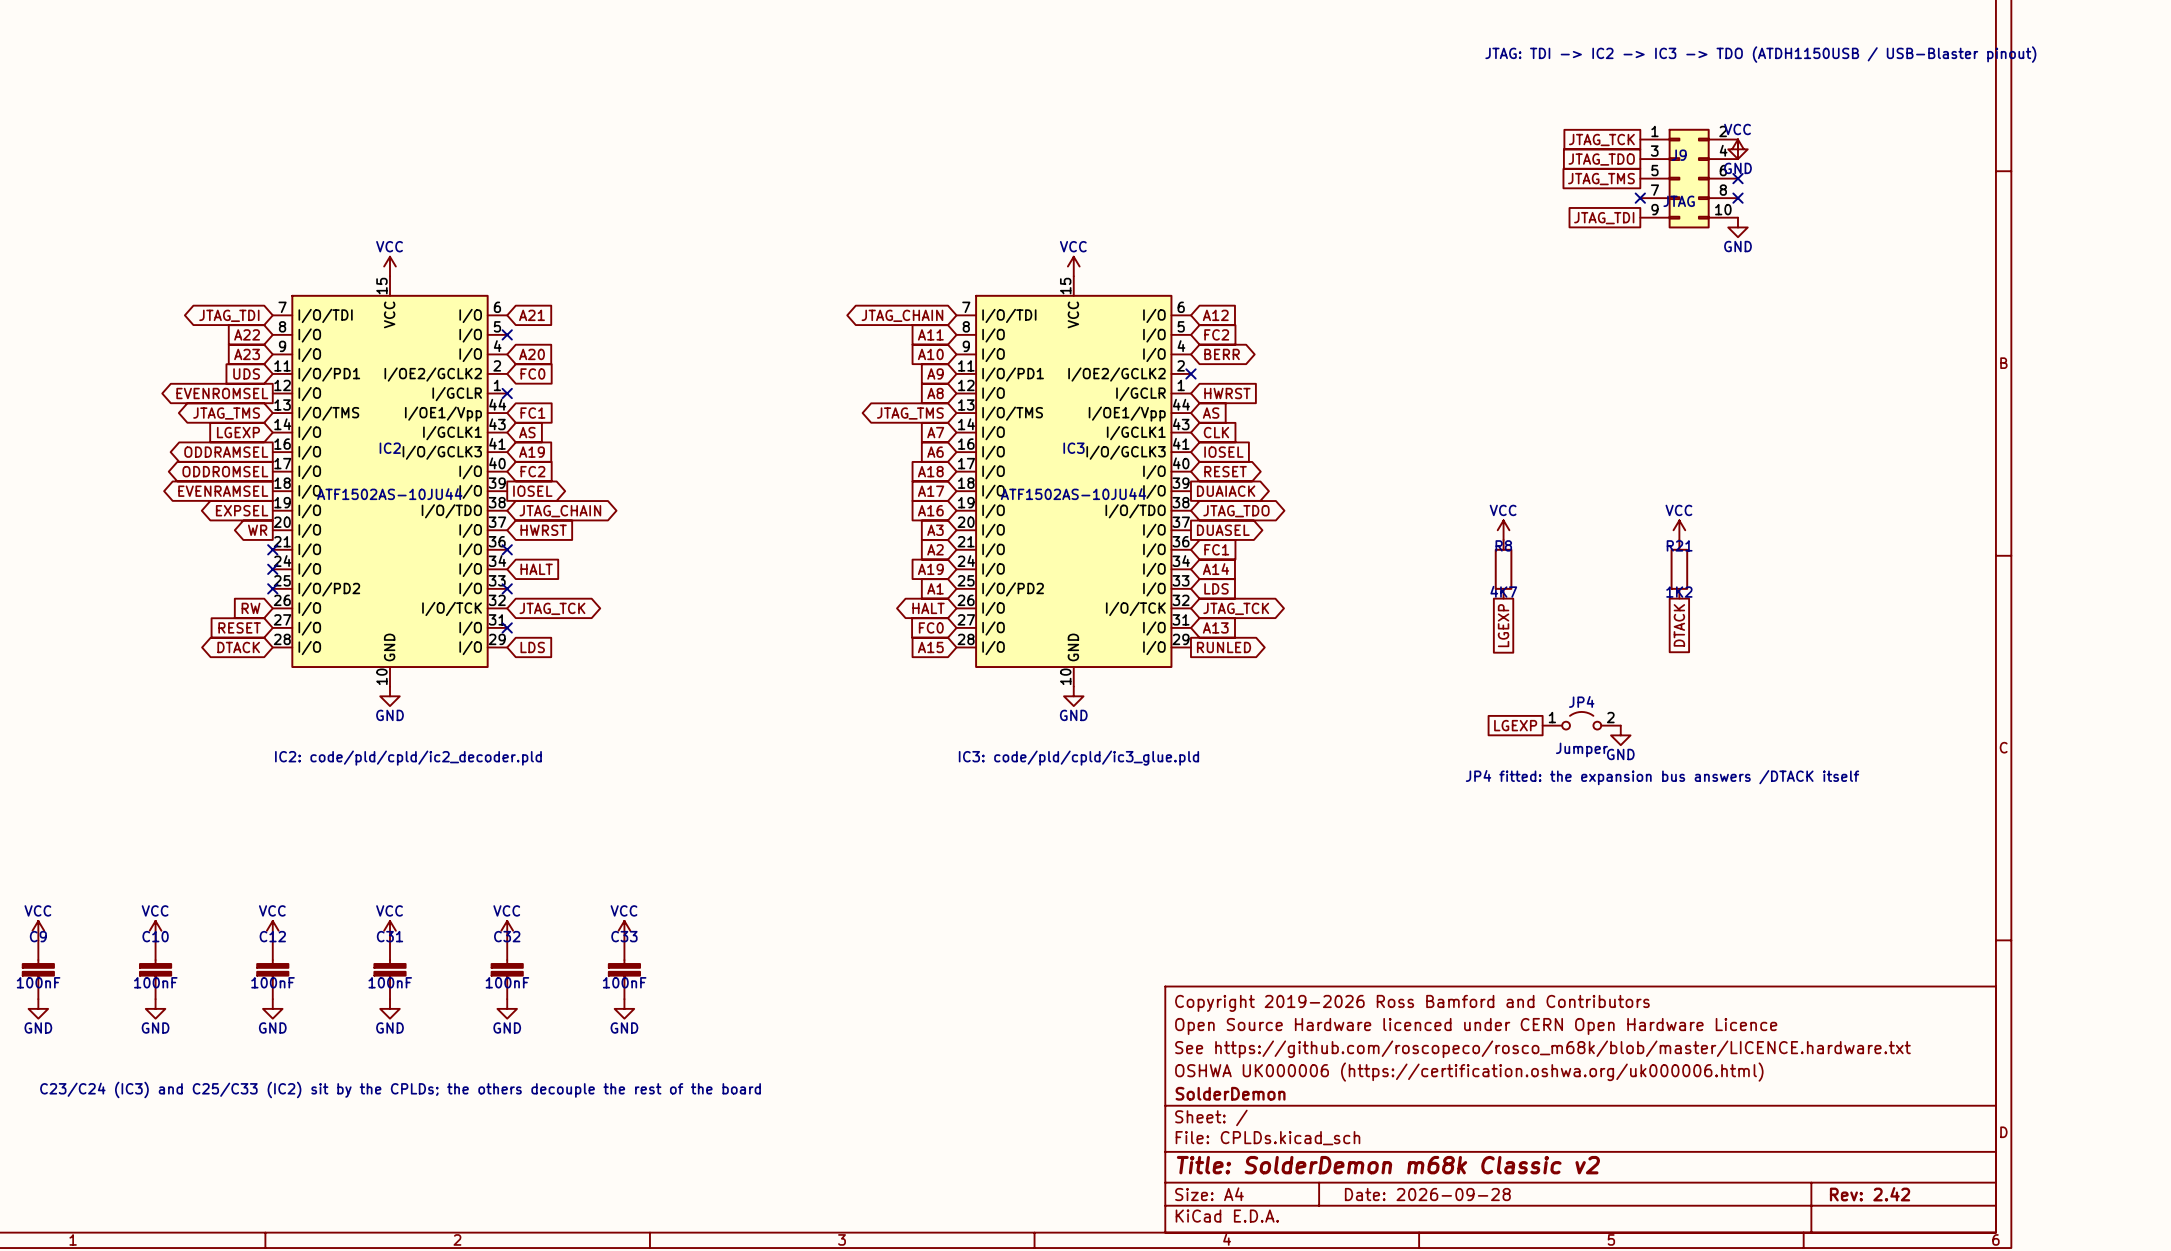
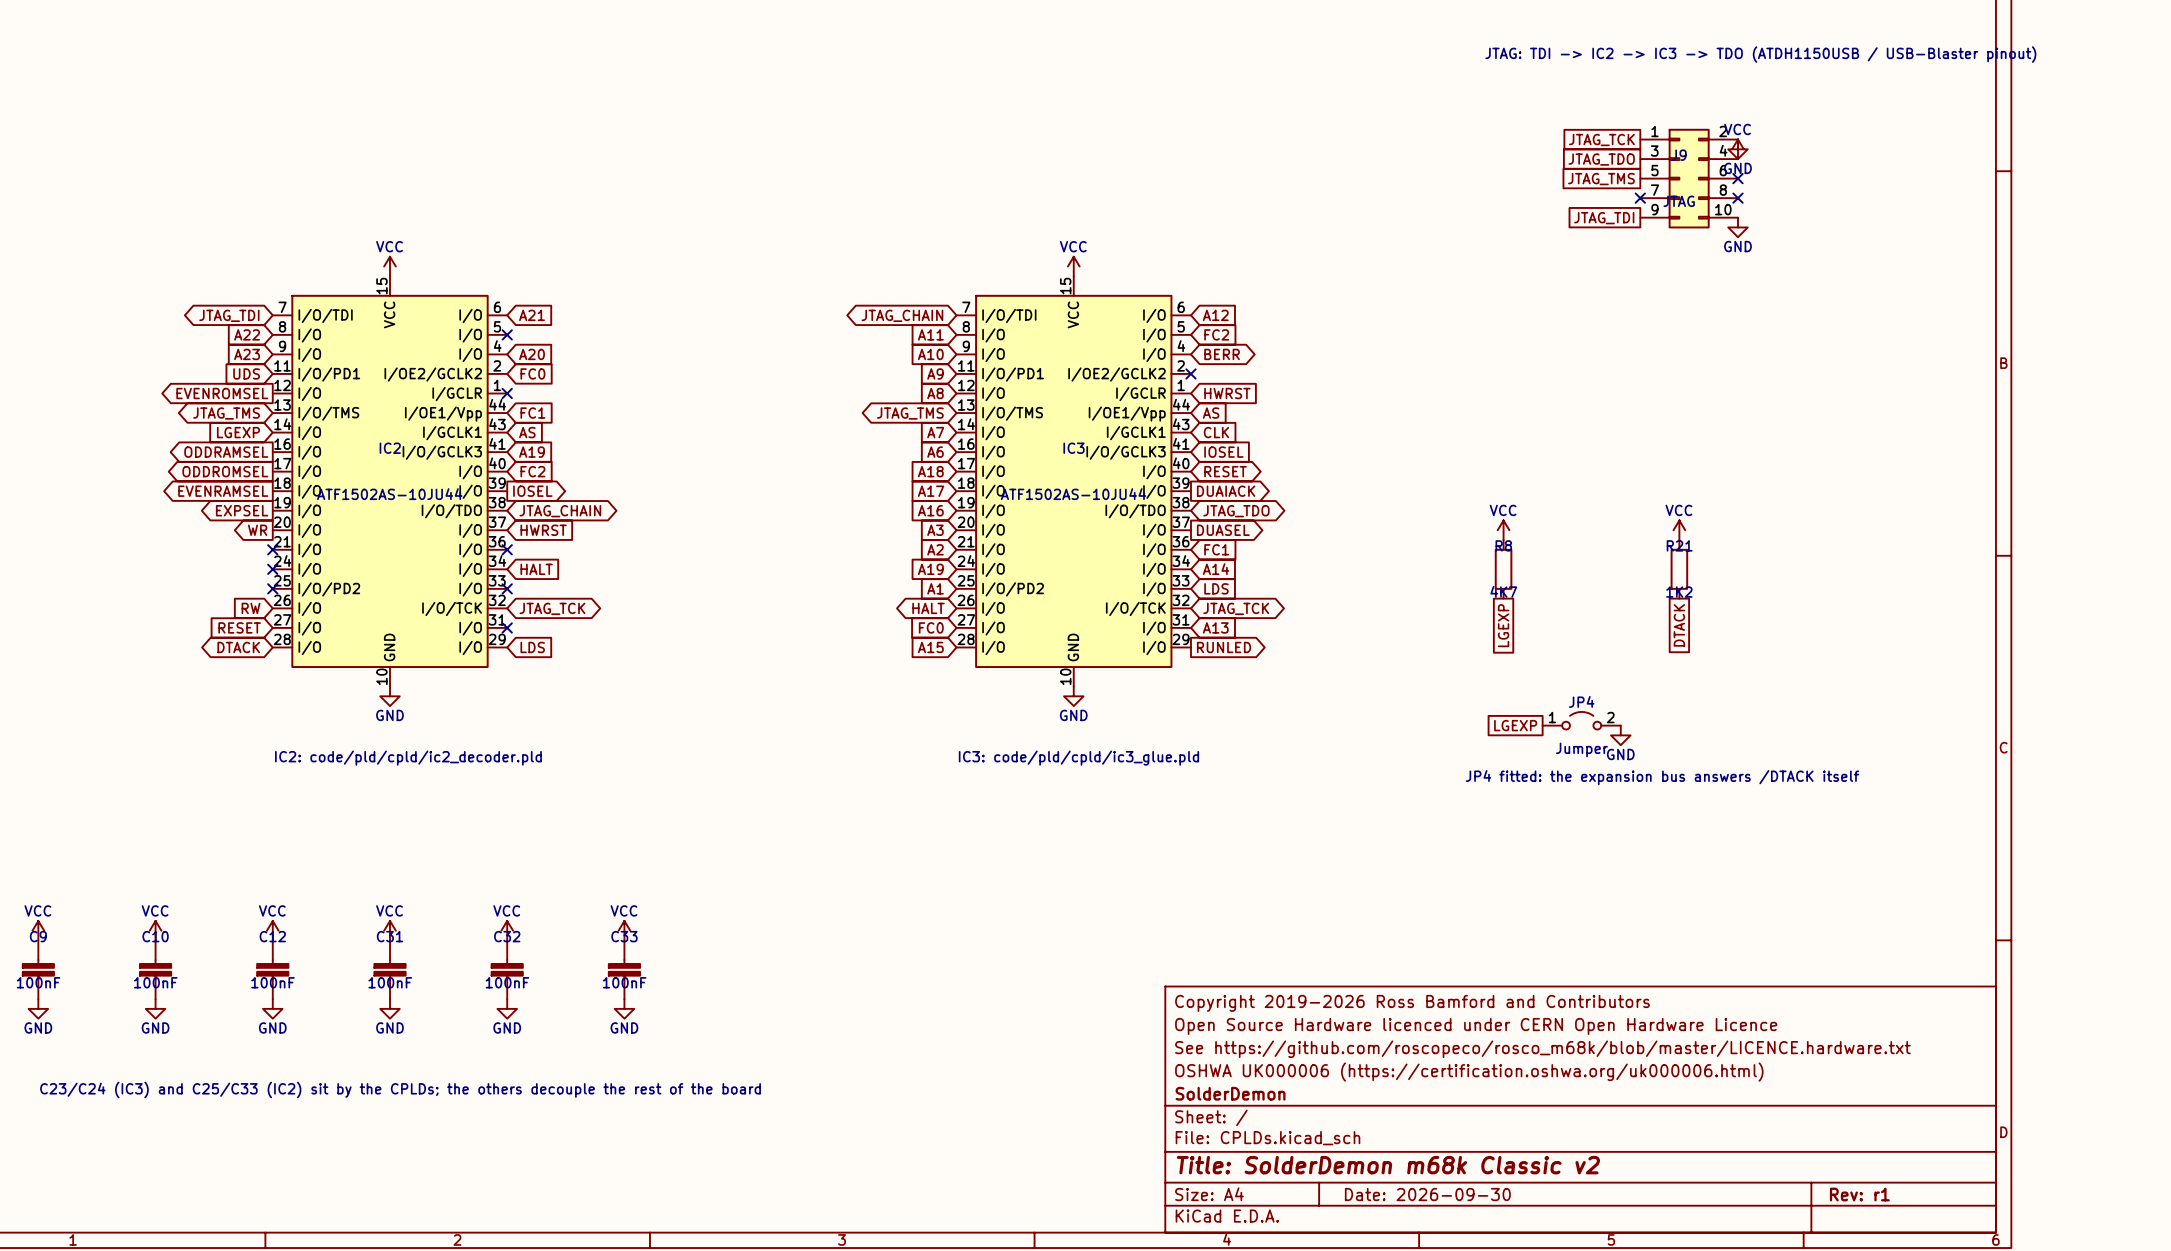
title block: Date: 2026-09-28 (1427, 1194) -> Date: 2026-09-30 (1427, 1194)
title block: Rev: 2.42 (1870, 1194) -> Rev: r1 (1859, 1194)

